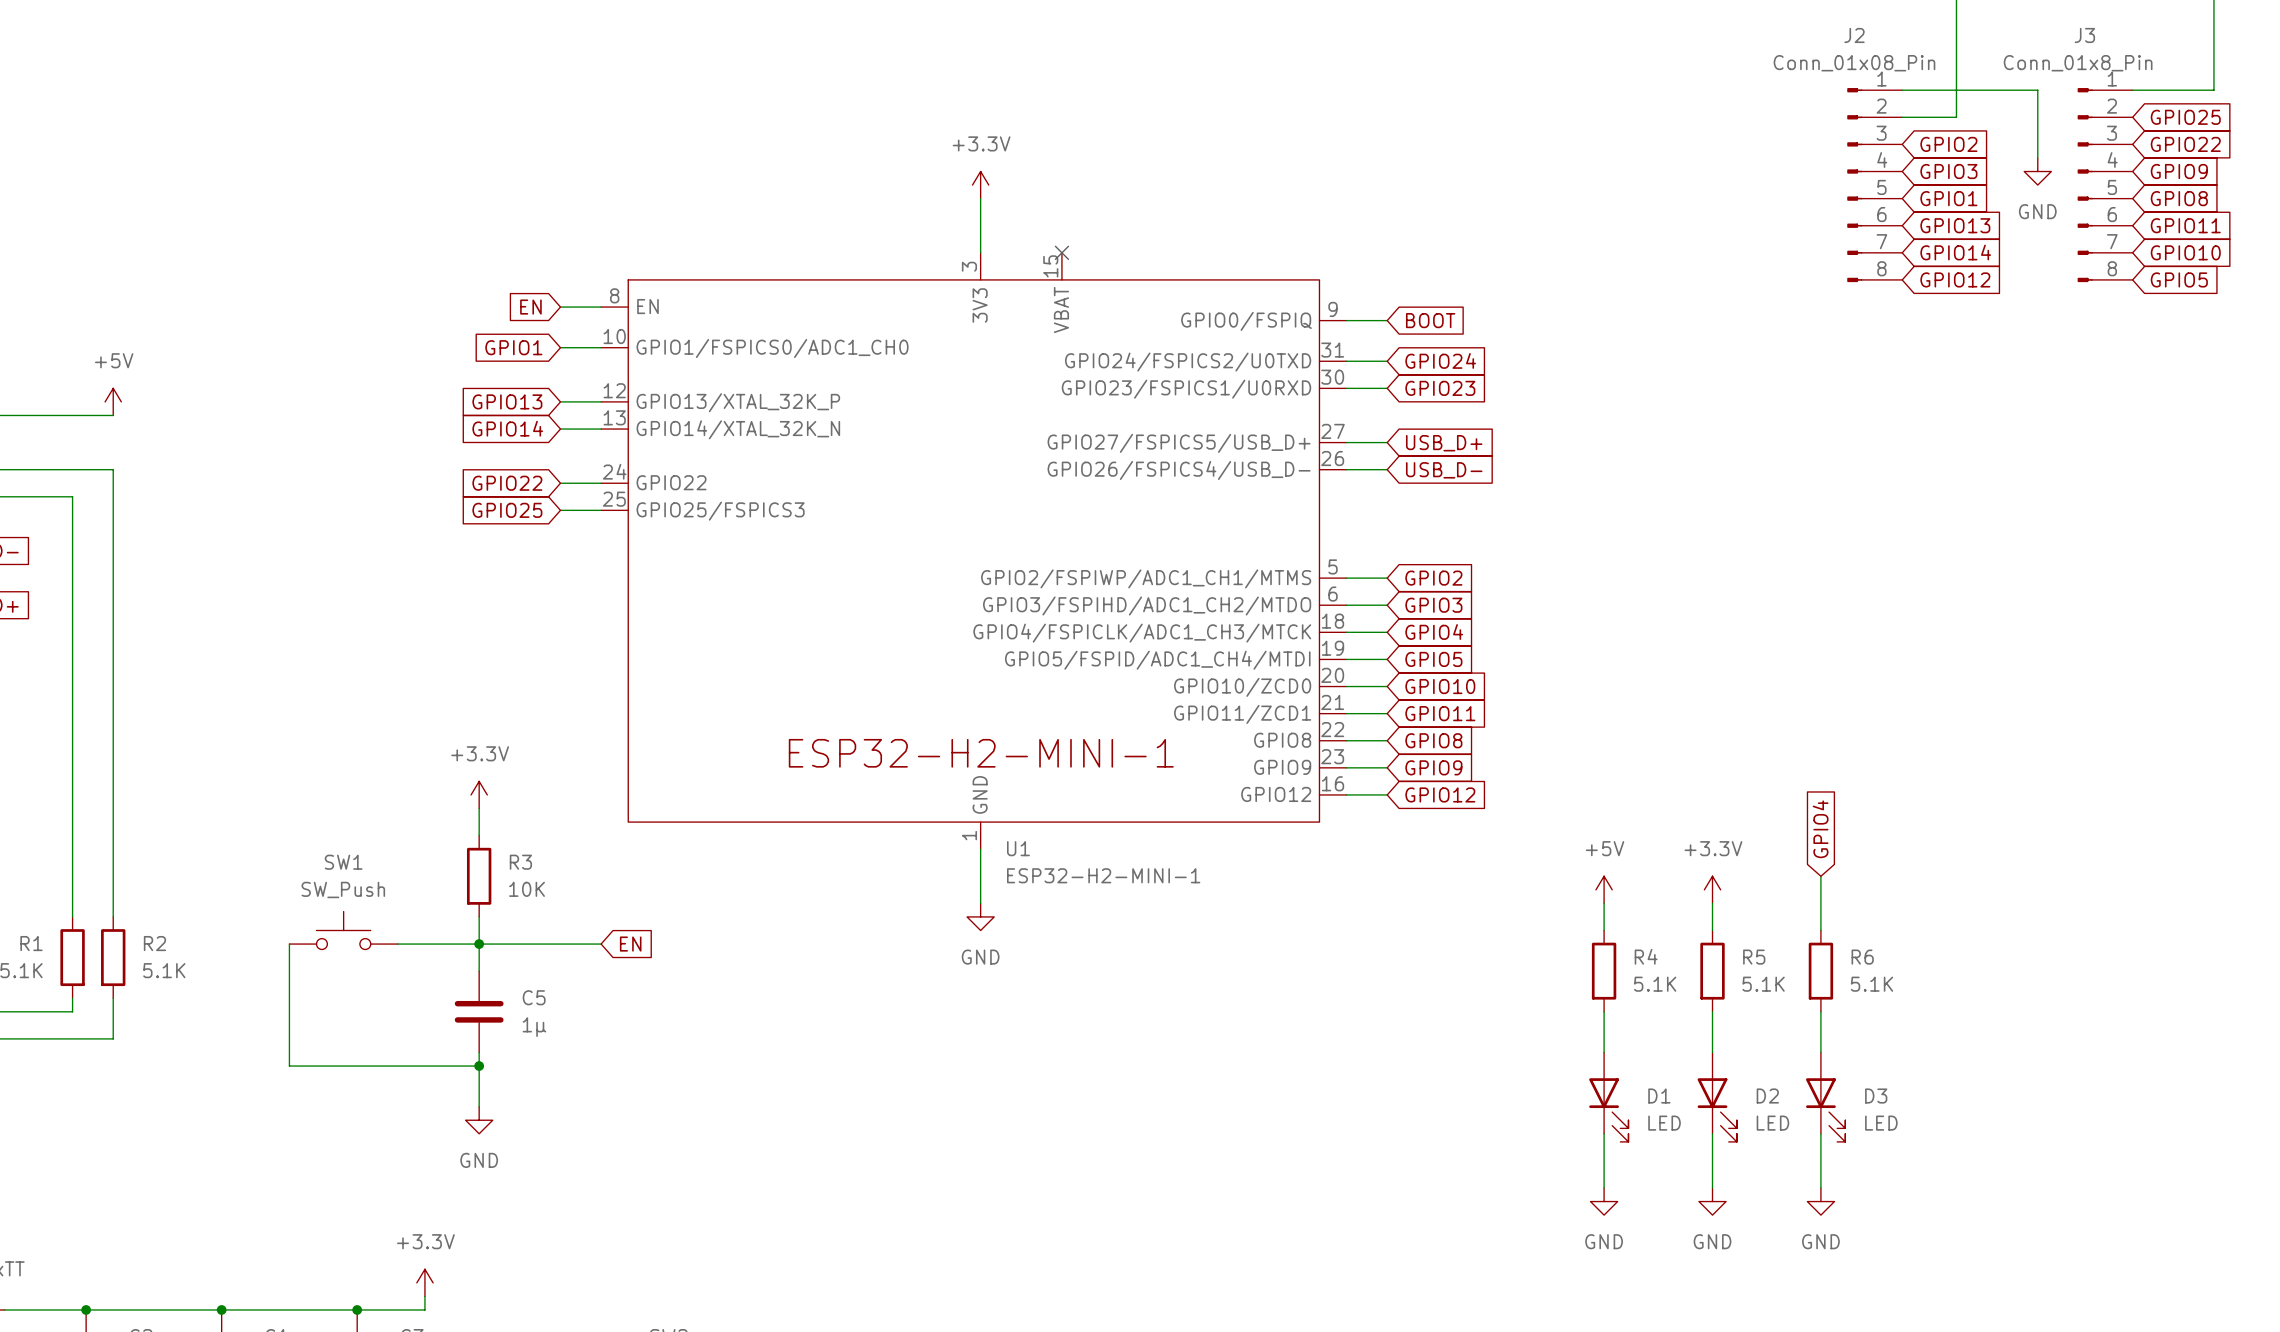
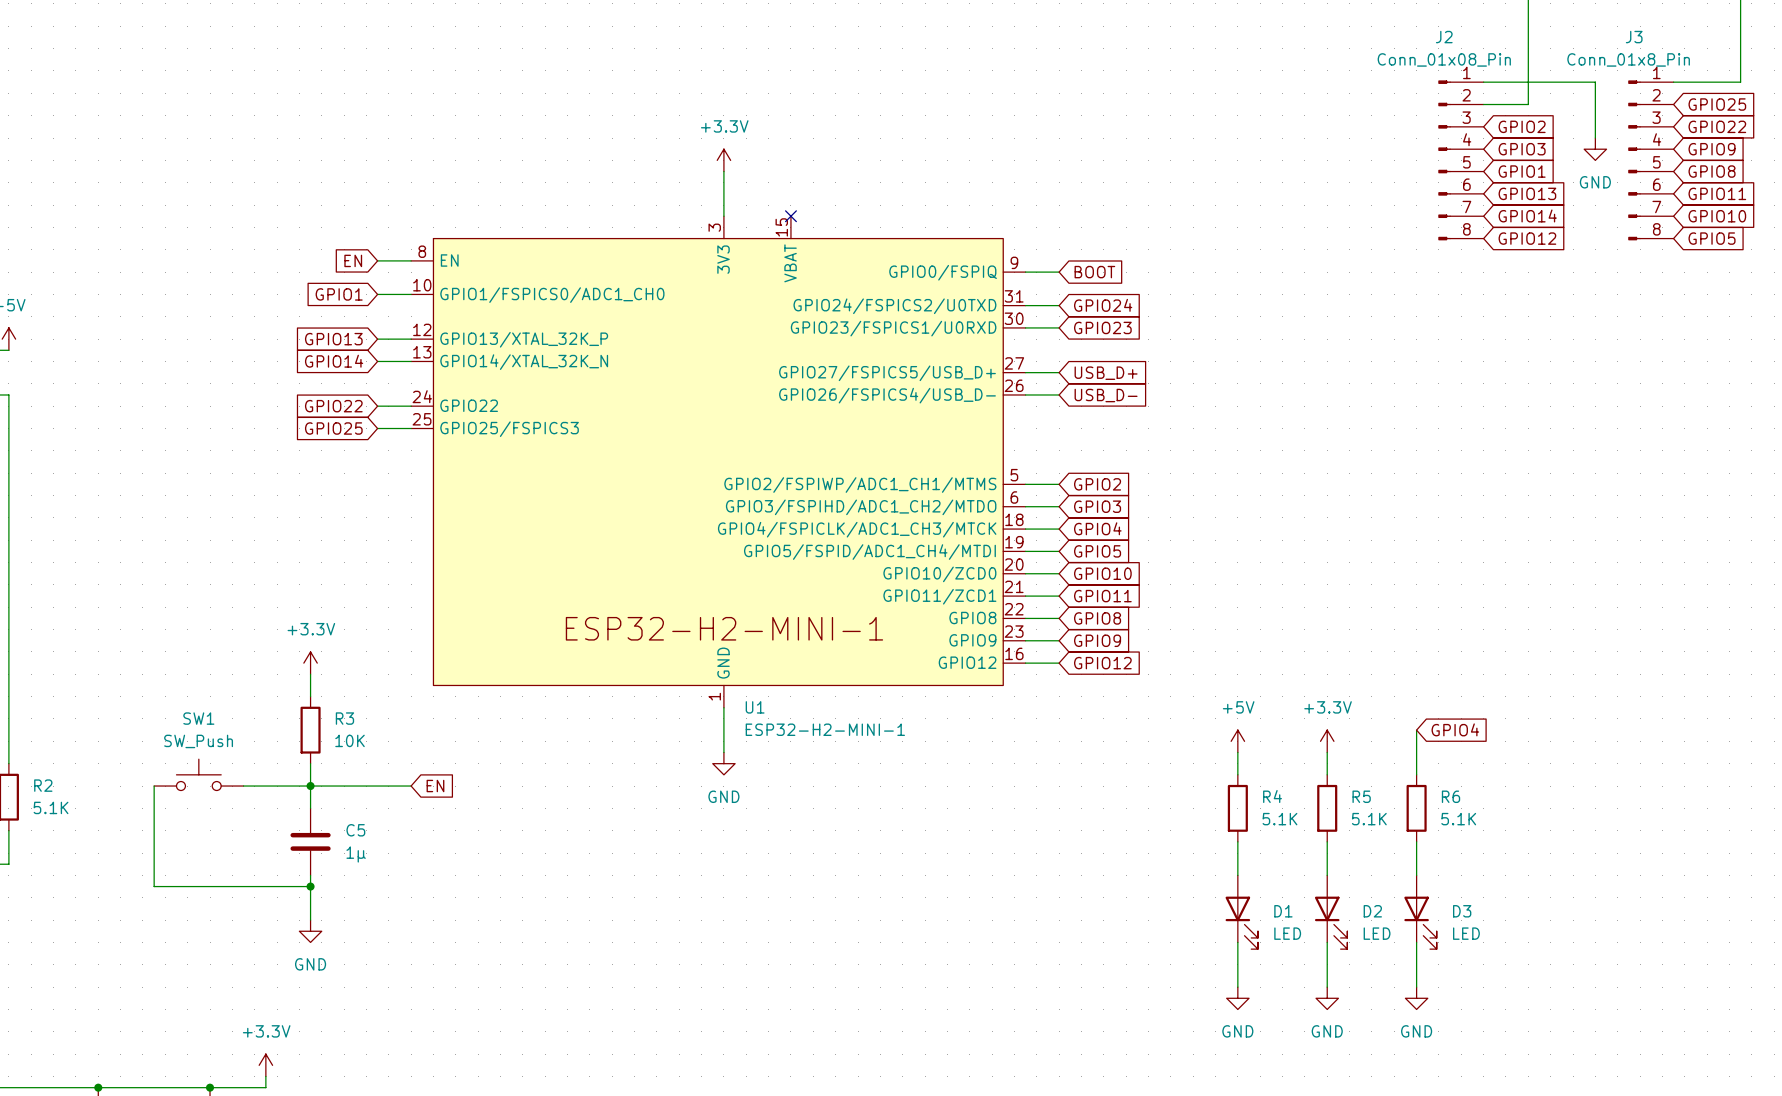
global label rotation: 0° (1820, 829) -> 90° clockwise (1455, 729)

